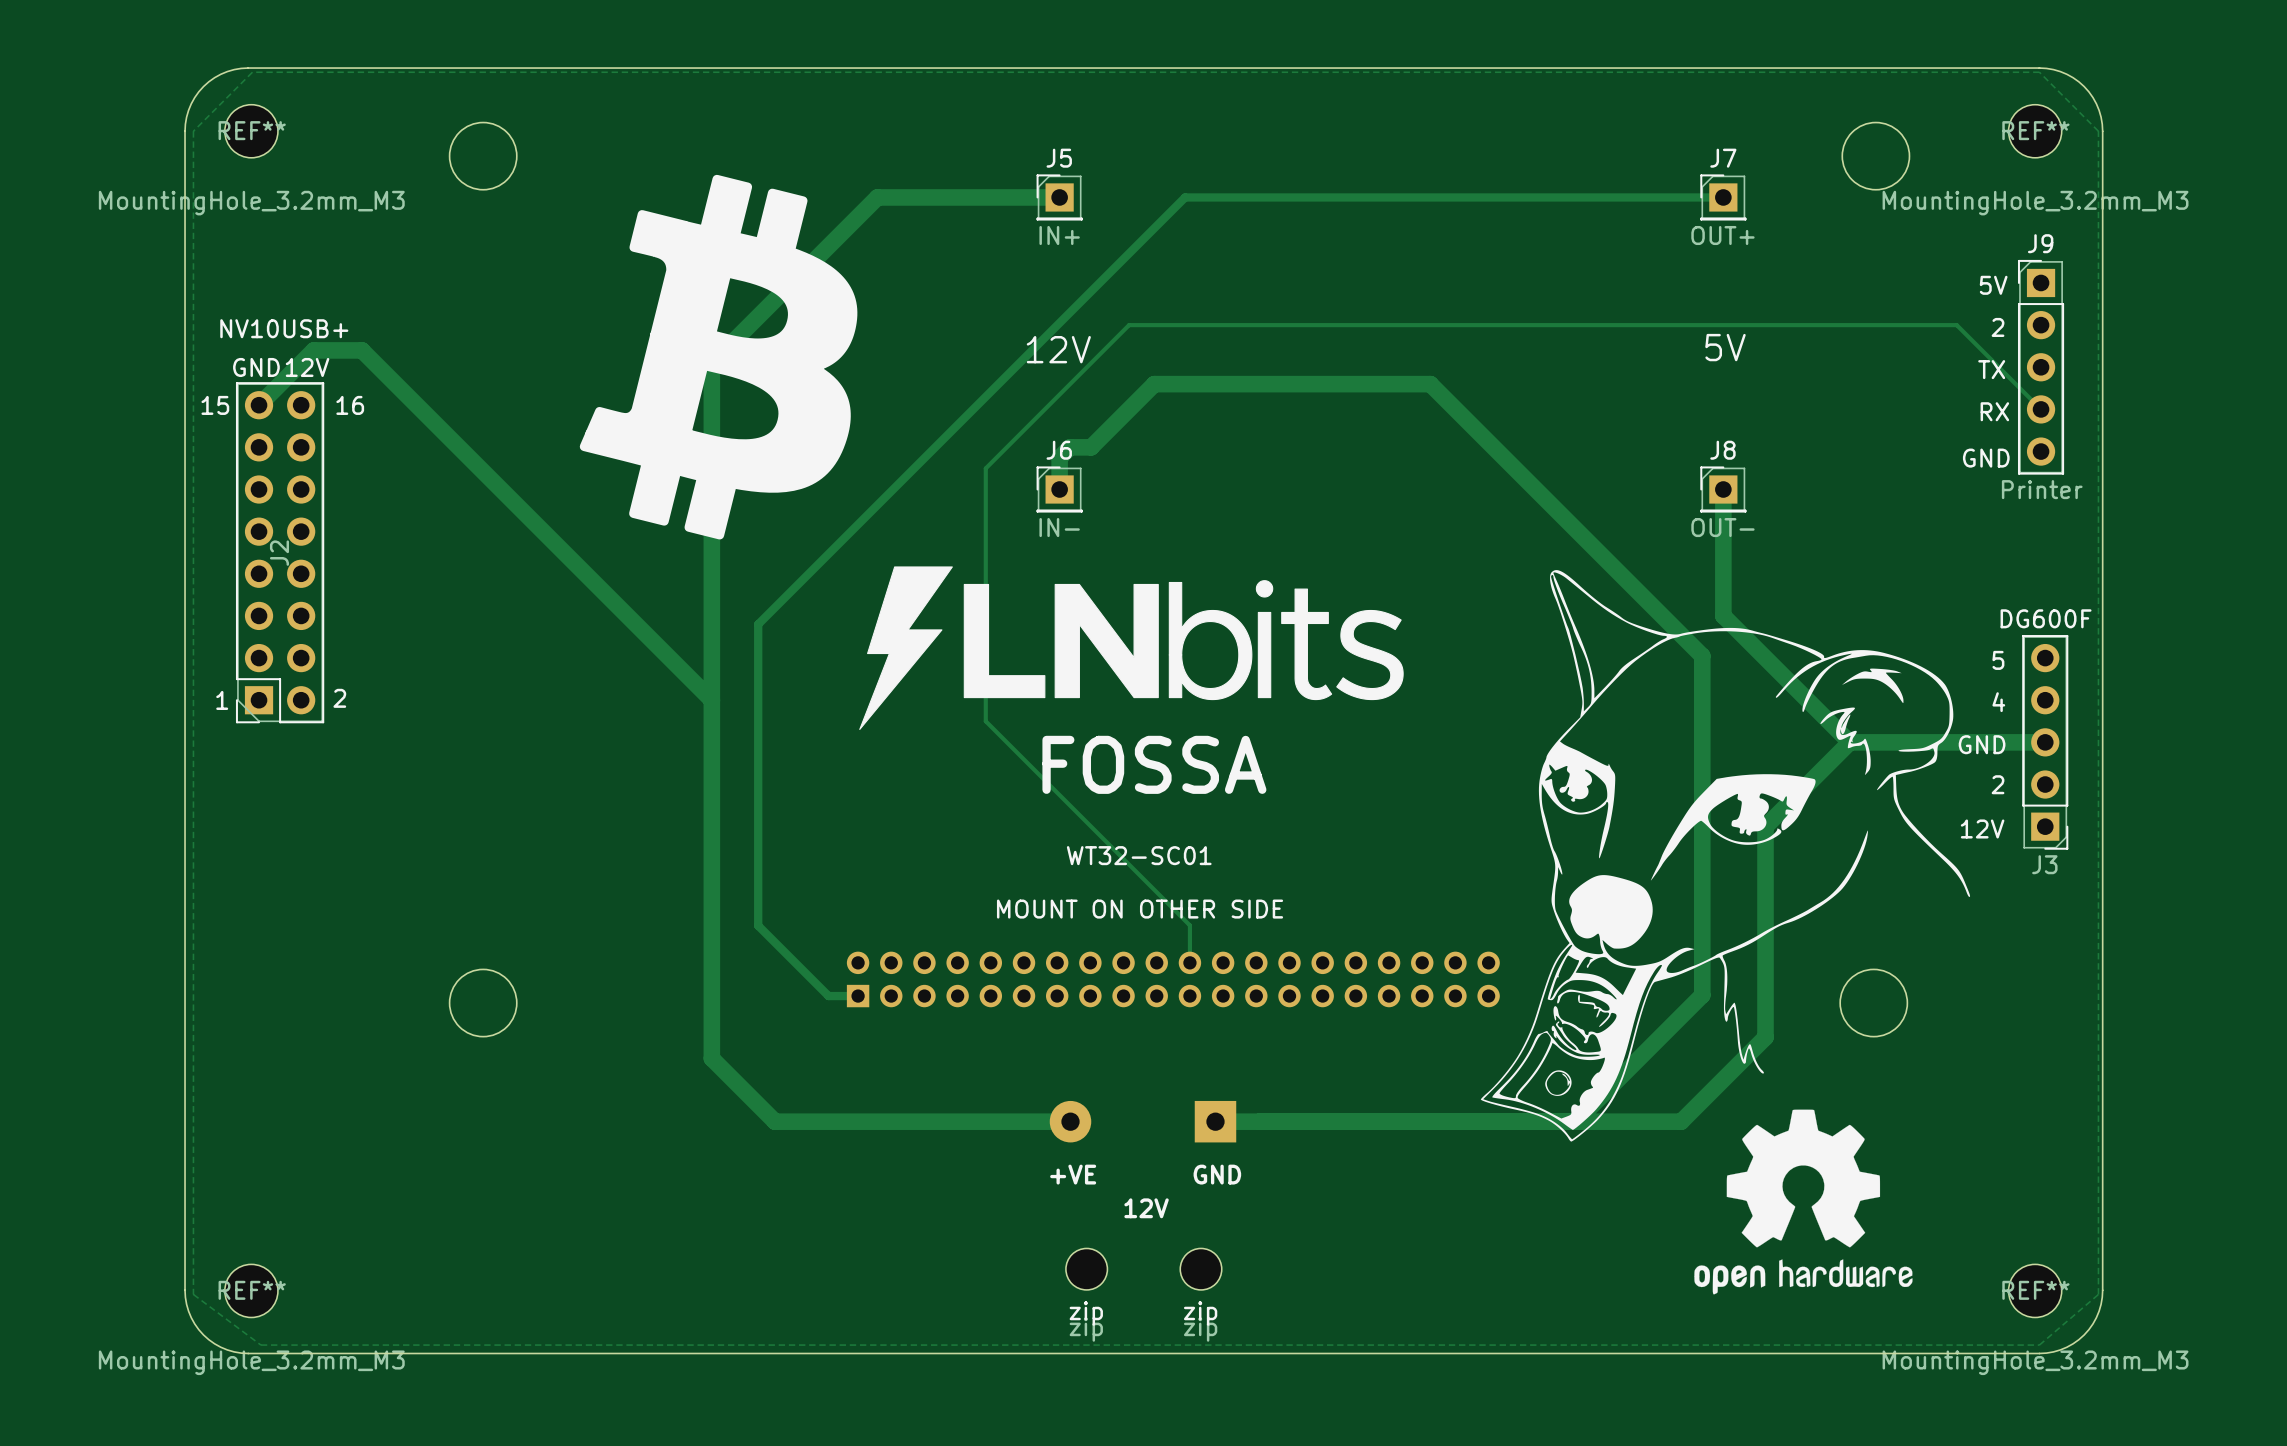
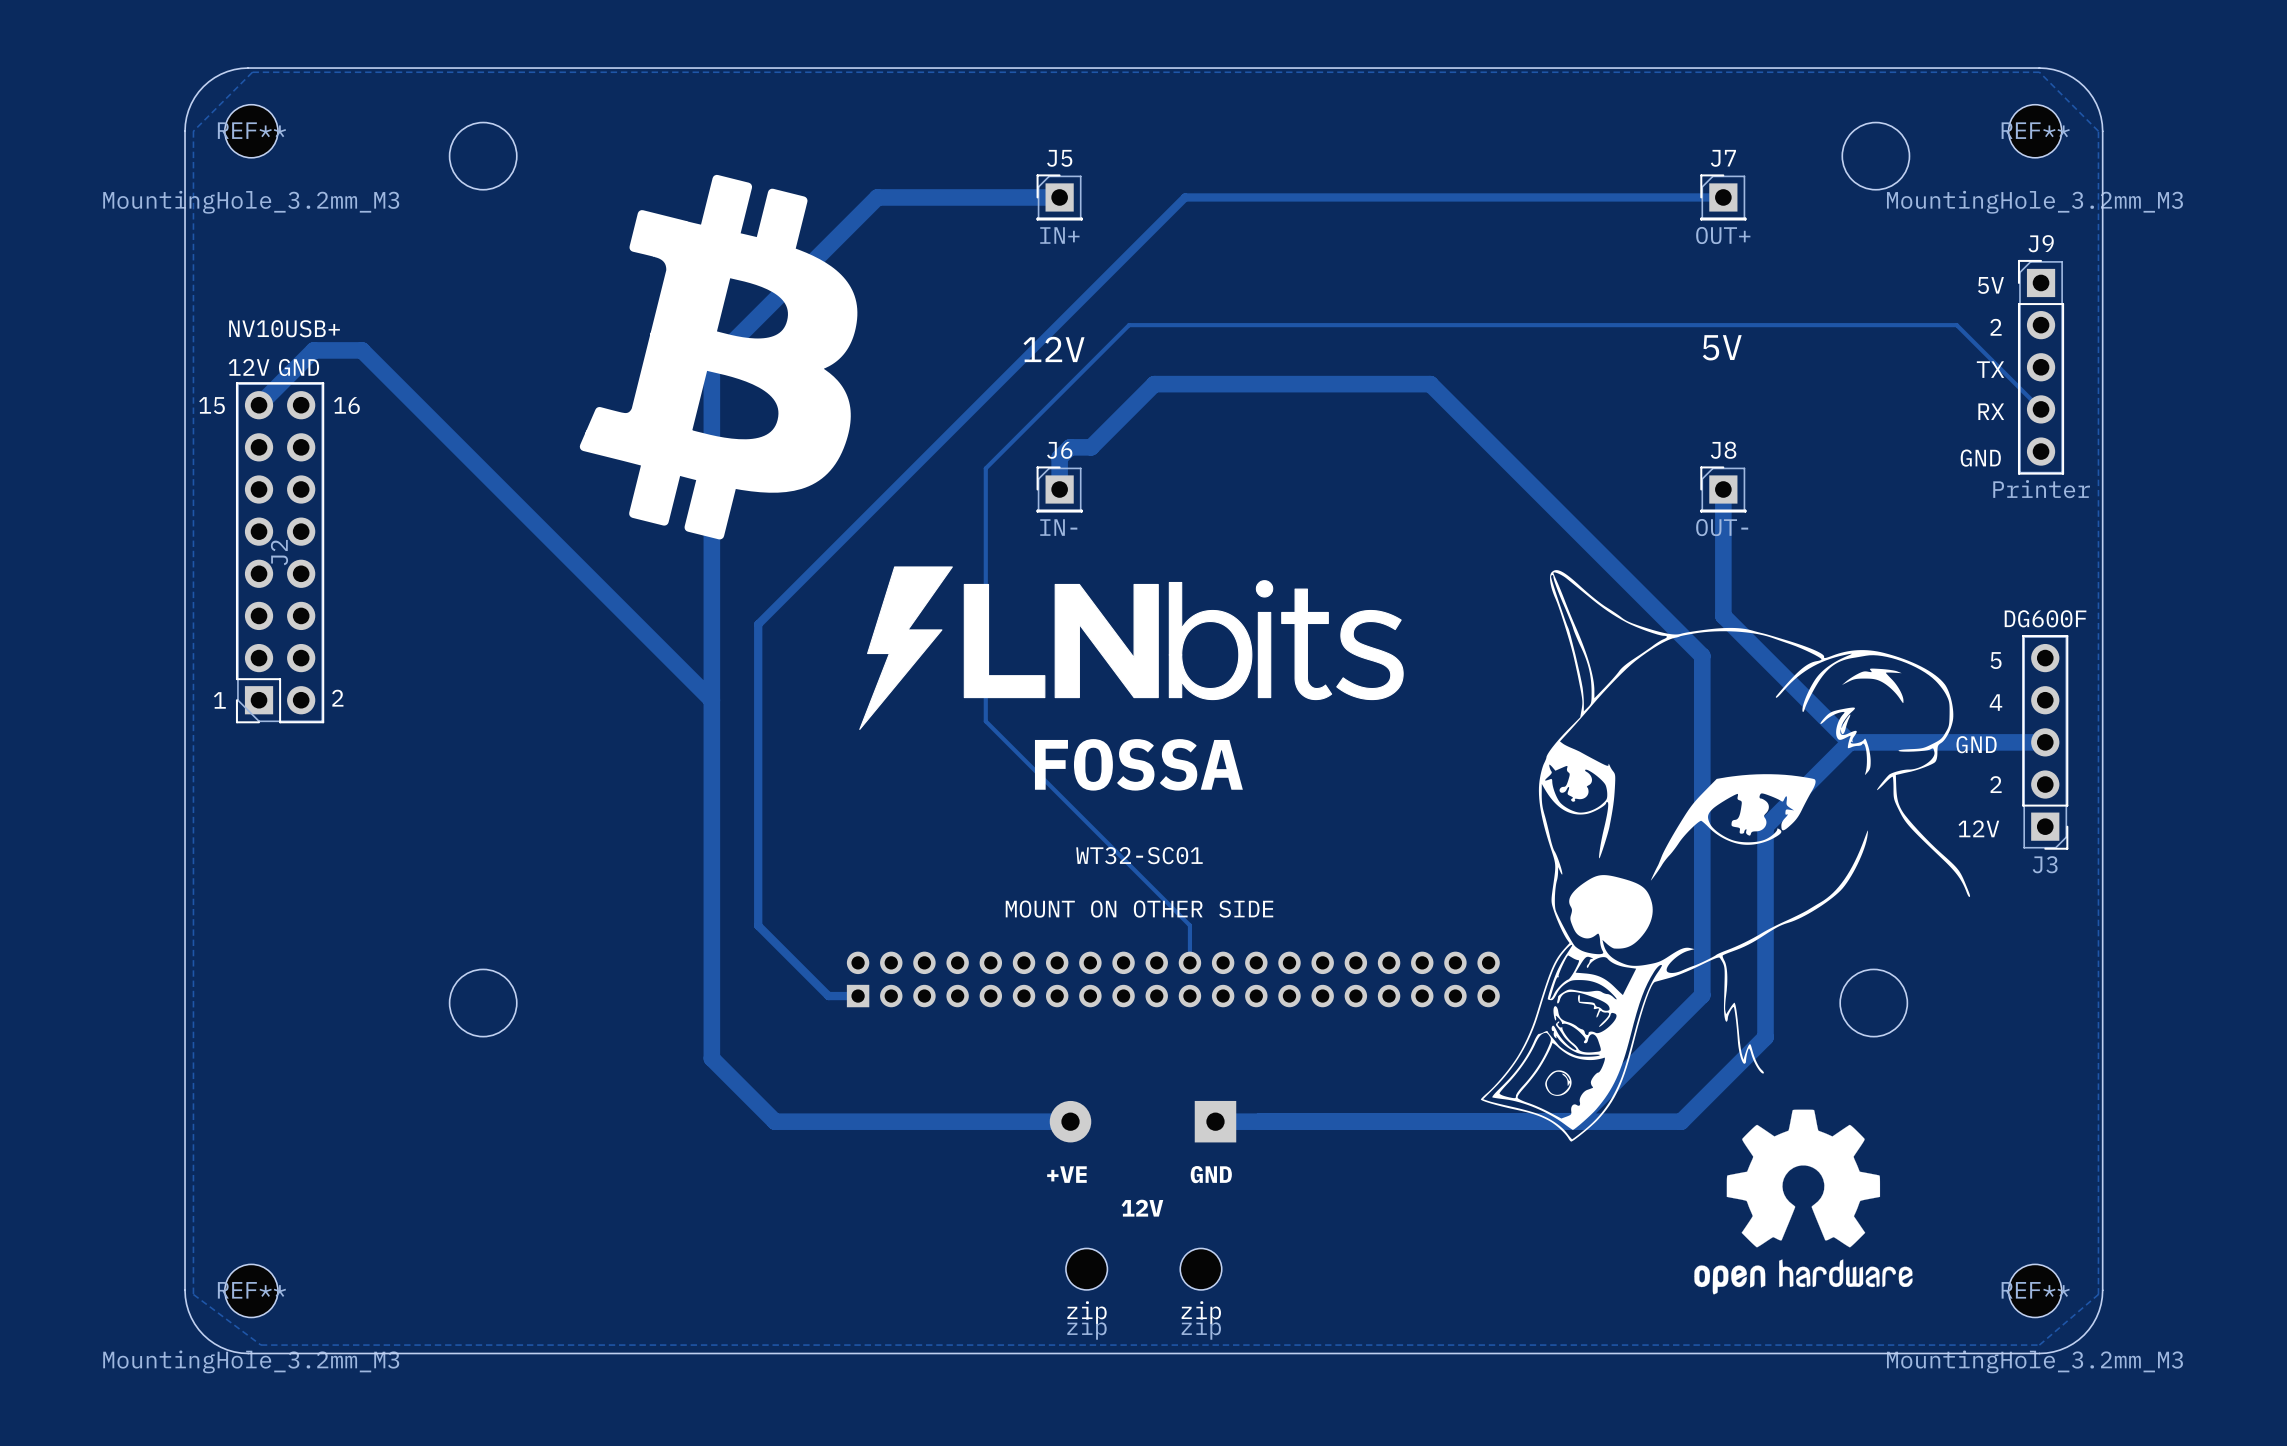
text position: GND (256, 367) -> GND (299, 367)
text position: 12V (307, 367) -> 12V (249, 367)

